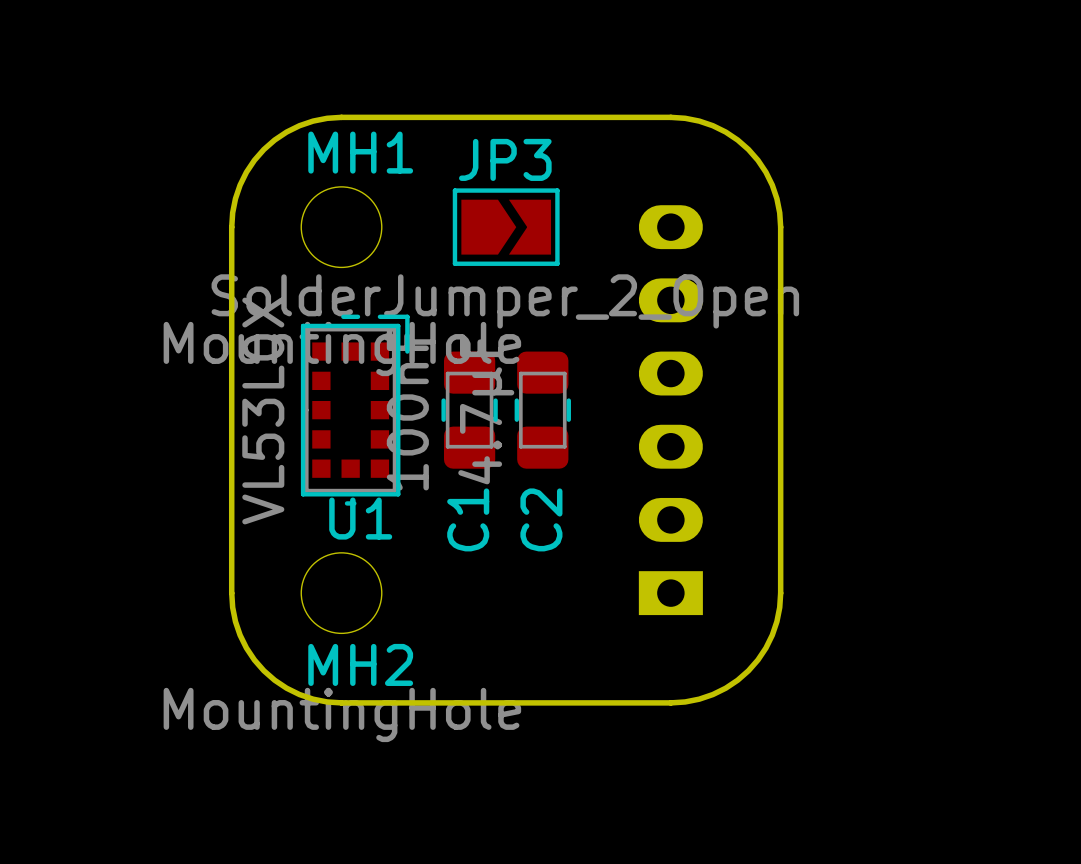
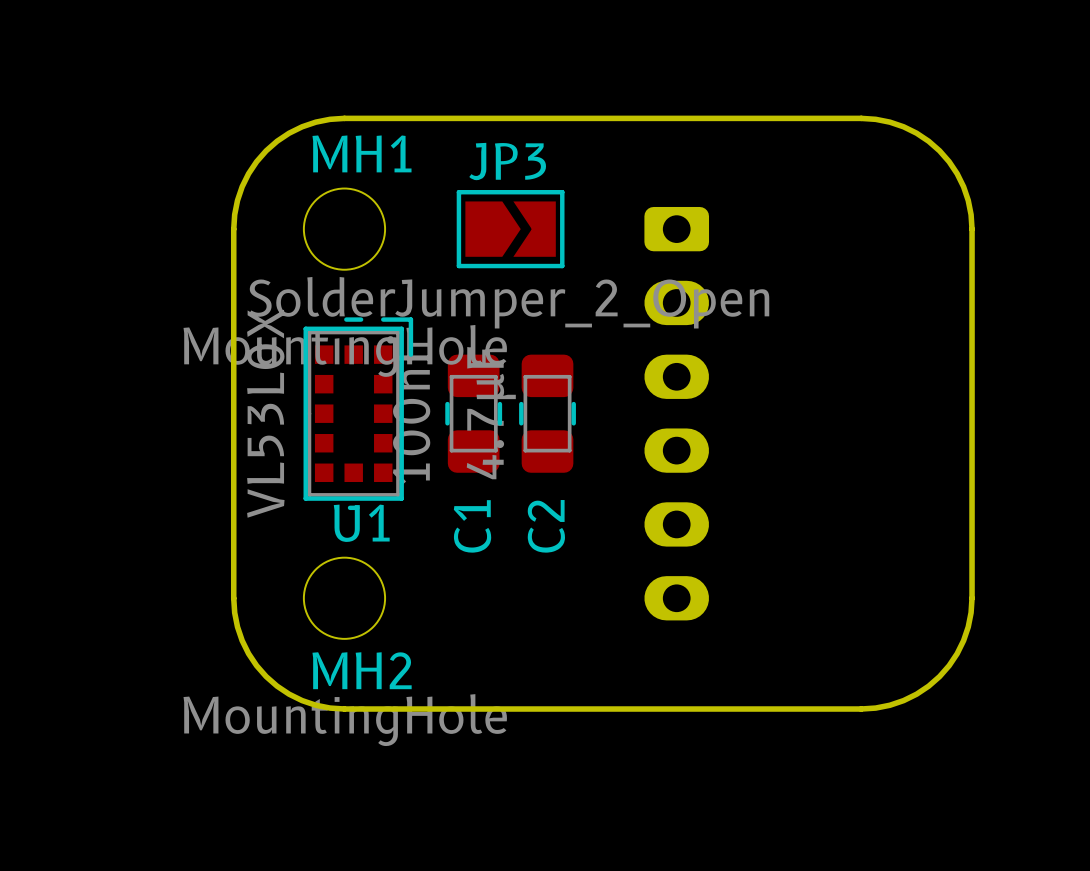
board edge: (670, 117) (685, 118) (712, 125) (725, 132) (748, 149) (765, 172) (772, 185) (779, 212) (780, 227) (780, 593) (776, 621) (765, 648) (748, 670) (737, 680) (712, 694) (685, 701) (670, 702) -> (676, 118) (861, 118) (875, 119) (903, 126) (916, 133) (939, 150) (957, 173) (968, 200) (972, 229) (972, 598) (968, 626) (957, 653) (939, 676) (916, 694) (903, 700) (875, 708) (676, 709)
part footprint: [638, 205, 703, 616] -> [644, 206, 710, 621]

